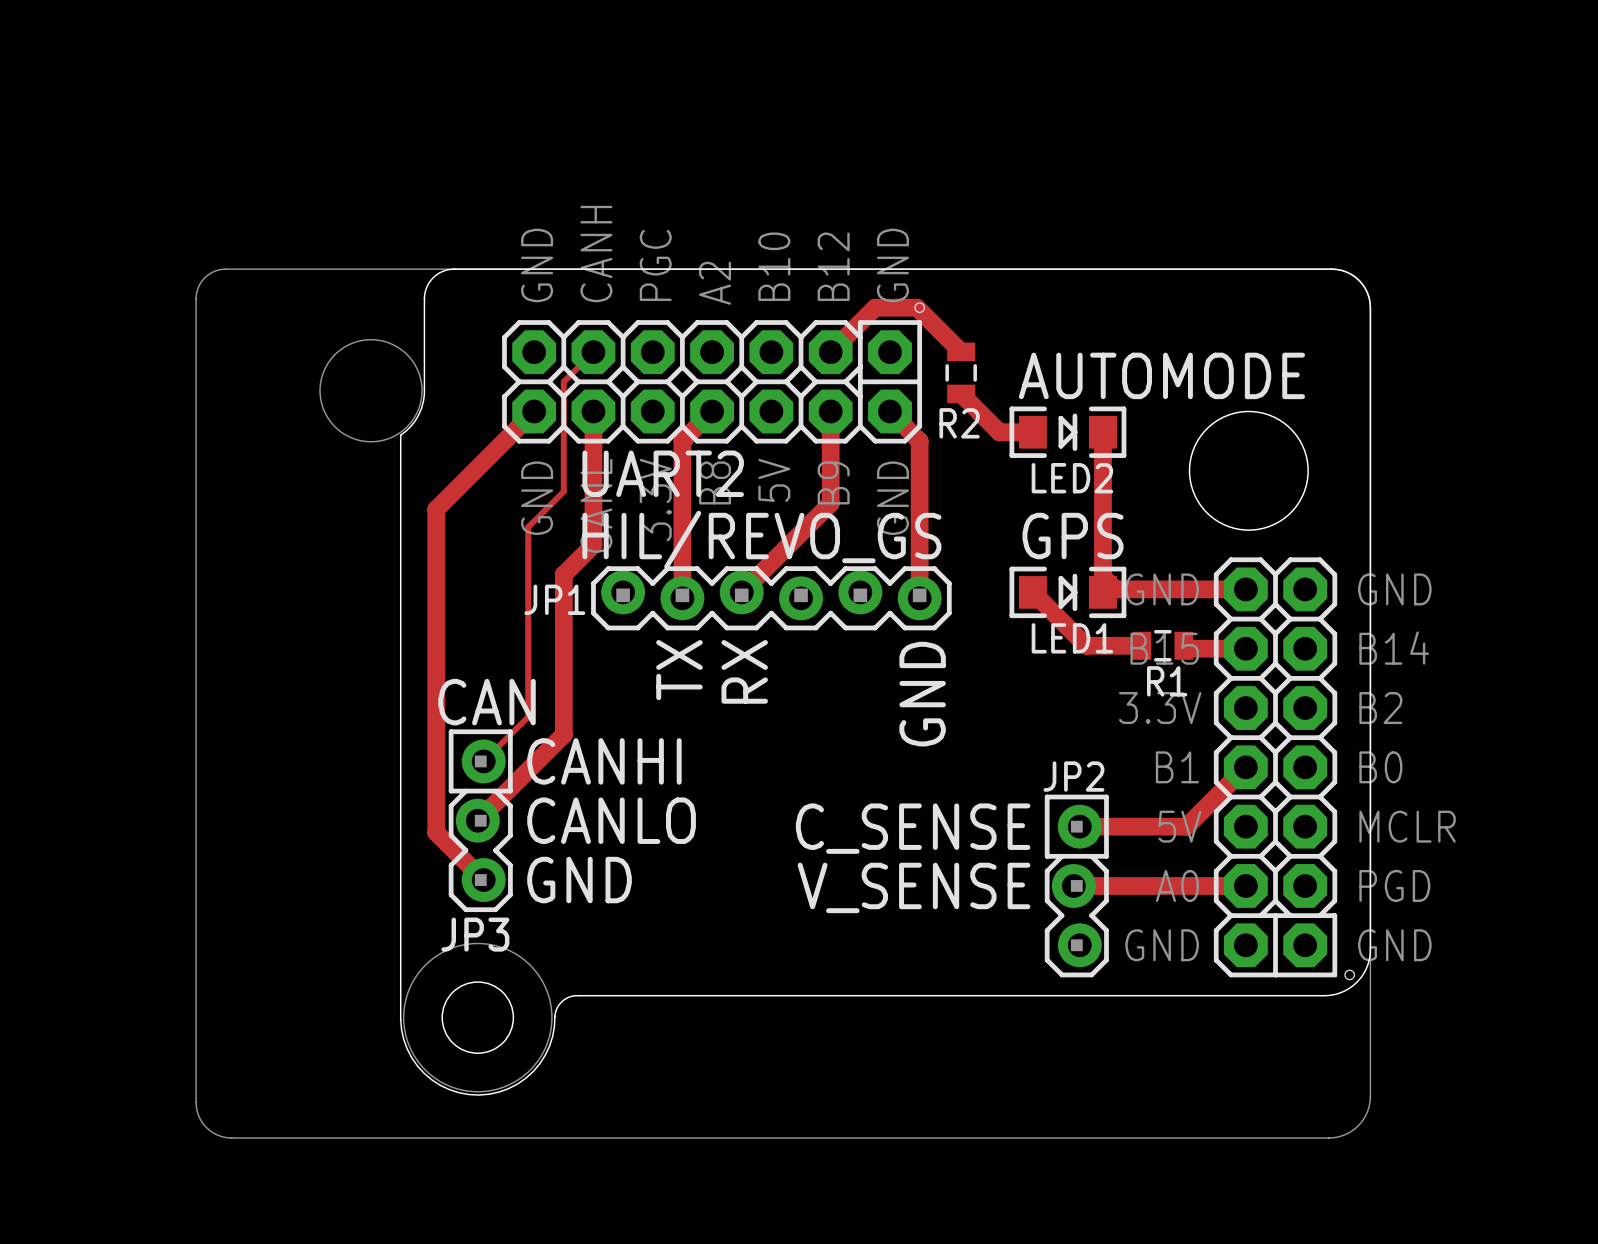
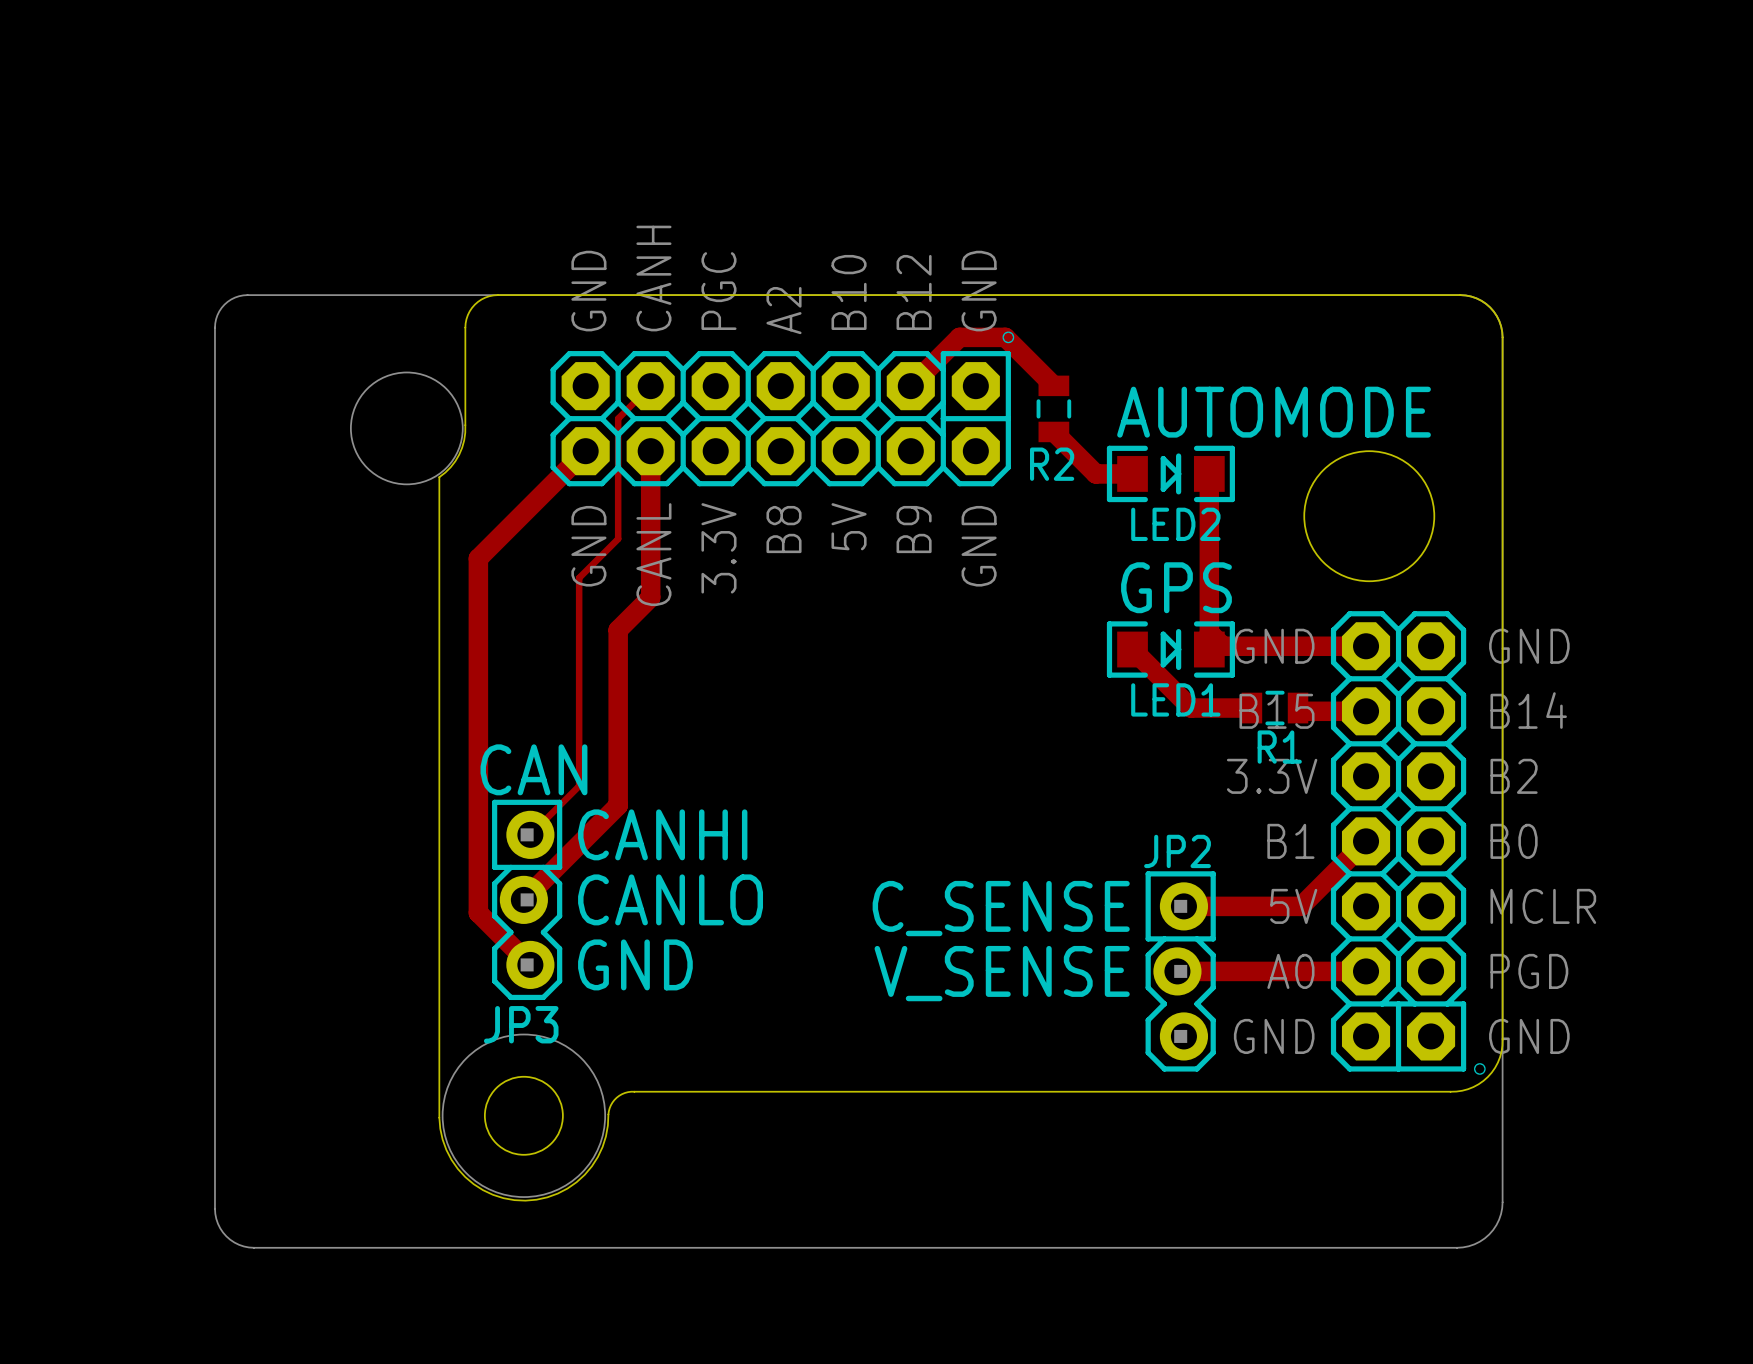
track: (712, 411) (682, 441) (682, 598) -> none
track: (830, 411) (830, 503) (741, 592) -> none
track: (890, 411) (919, 441) (919, 598) -> none
text: UART2 (663, 473) -> none
text: HIL/REVO_GS (761, 539) -> none
JP1: (771, 598) -> none
text: TX (679, 670) -> none
text: RX (744, 671) -> none
text: GND (922, 694) -> none

